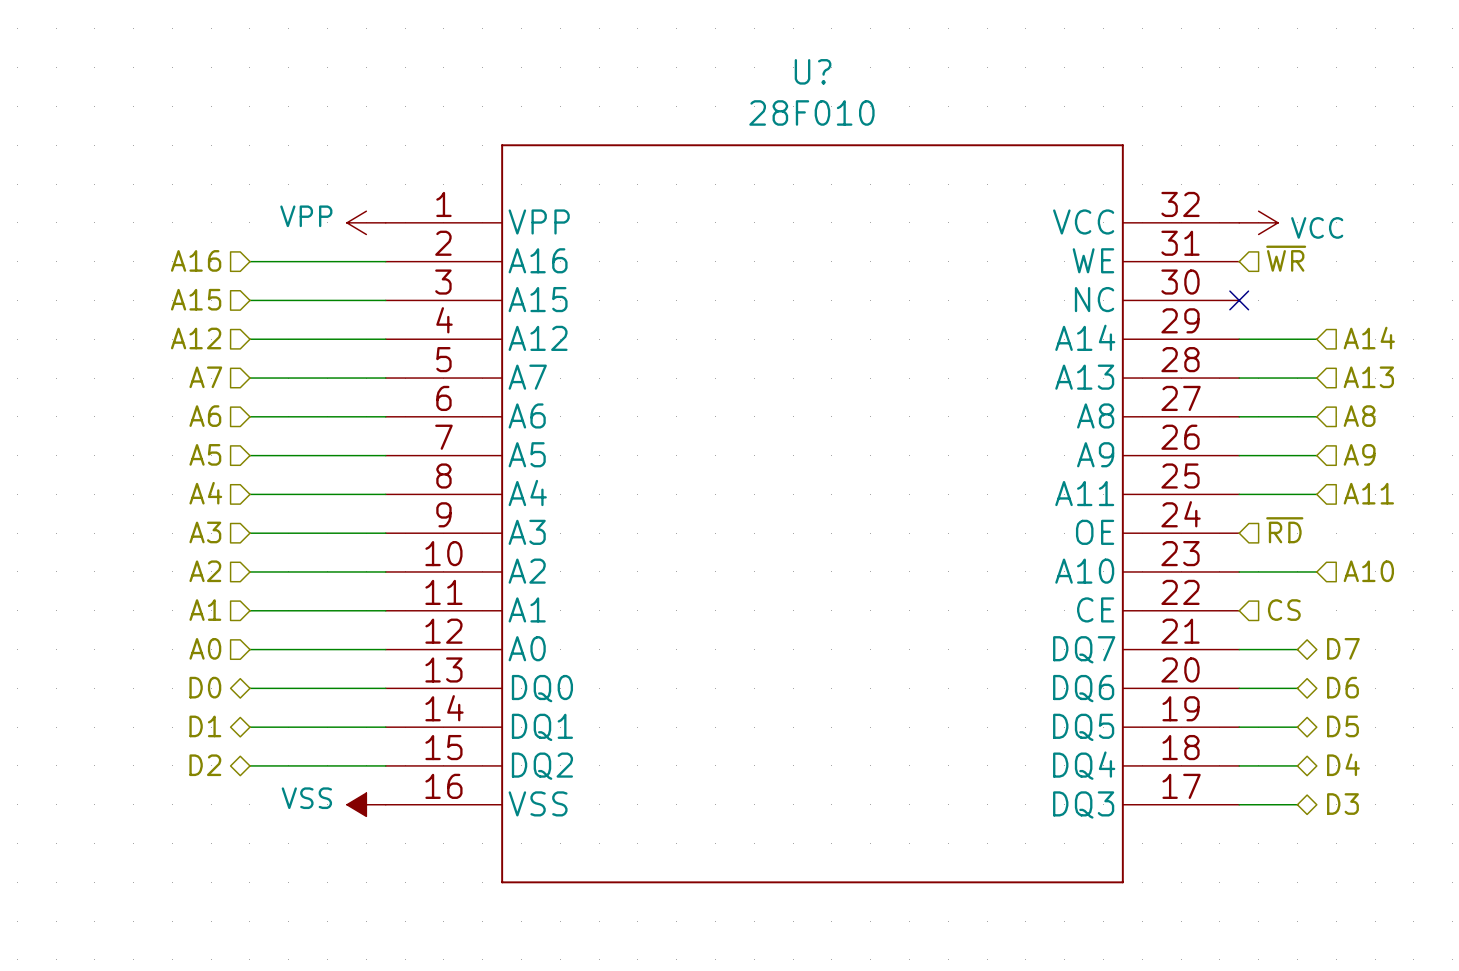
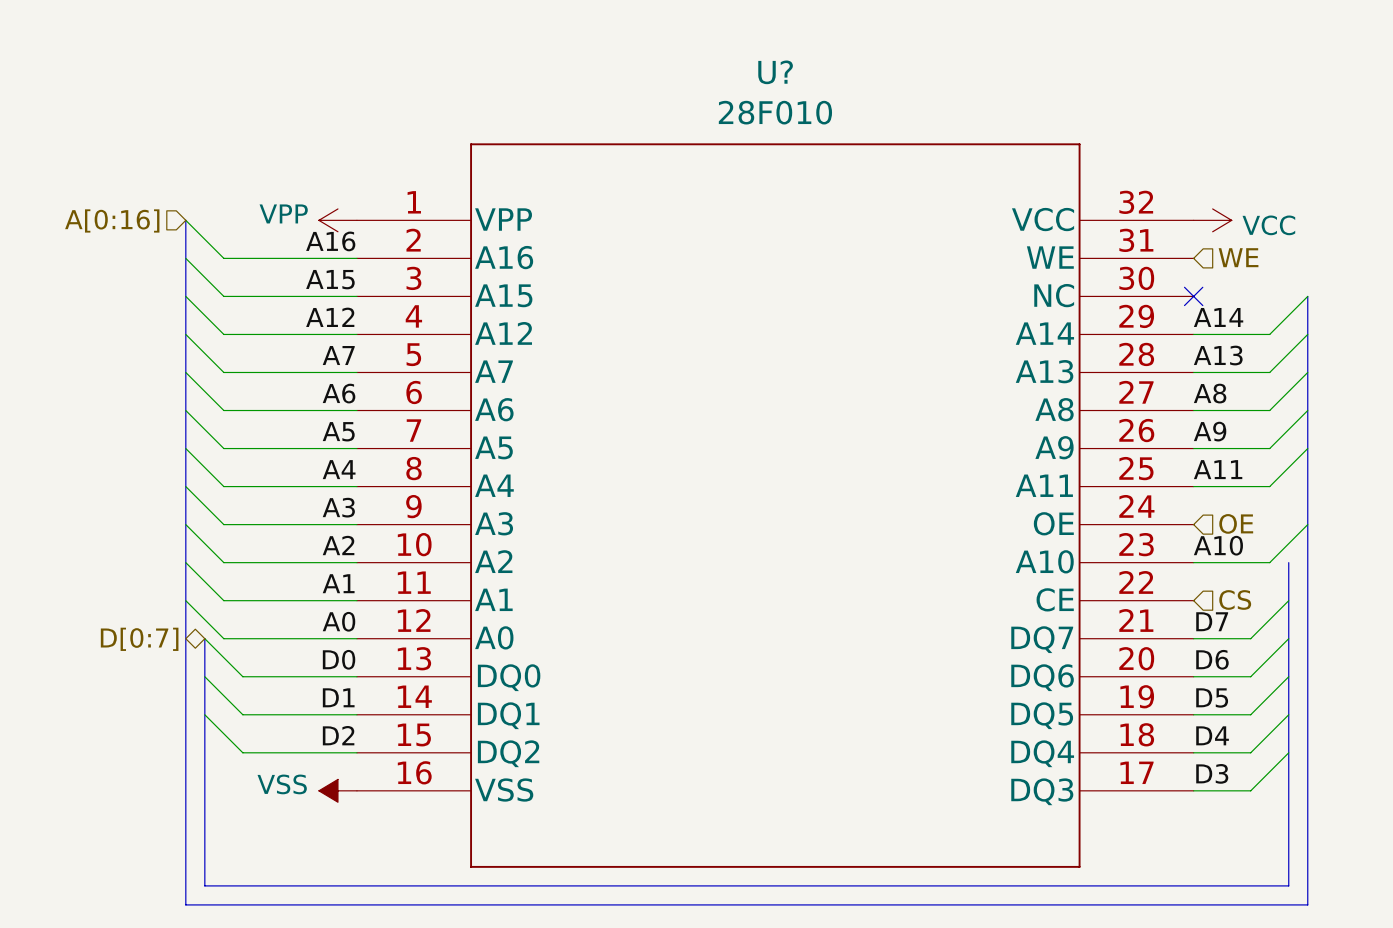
wire: none -> (185, 220) (223, 258)
bus: none -> (185, 220) (185, 904) (1307, 904) (1307, 296)
hierarchical label: none -> A[0:16] (112, 220)
label: none -> A16 (330, 241)
hierarchical label: ~{WR} (1286, 258) -> WE (1238, 257)
hierarchical label: A16 (196, 260) -> none
wire: none -> (185, 258) (223, 296)
label: none -> A15 (330, 279)
hierarchical label: A15 (196, 299) -> none
wire: none -> (185, 296) (223, 334)
wire: none -> (1307, 296) (1269, 334)
label: none -> A12 (330, 317)
label: none -> A14 (1218, 317)
hierarchical label: A12 (196, 338) -> none
hierarchical label: A14 (1369, 338) -> none
wire: none -> (185, 334) (223, 372)
wire: none -> (1307, 334) (1269, 372)
label: none -> A7 (338, 355)
label: none -> A13 (1218, 355)
hierarchical label: A7 (205, 377) -> none
hierarchical label: A13 (1368, 377) -> none
wire: none -> (185, 372) (223, 410)
wire: none -> (1307, 372) (1269, 410)
label: none -> A6 (339, 393)
label: none -> A8 (1210, 393)
hierarchical label: A6 (205, 416) -> none
wire: none -> (185, 410) (223, 448)
wire: none -> (1307, 410) (1269, 448)
hierarchical label: A8 (1359, 416) -> none
label: none -> A5 (338, 431)
label: none -> A9 (1210, 431)
hierarchical label: A5 (205, 454) -> none
hierarchical label: A9 (1359, 454) -> none
wire: none -> (185, 448) (223, 486)
wire: none -> (1307, 448) (1269, 486)
label: none -> A4 (339, 469)
label: none -> A11 (1218, 469)
hierarchical label: A4 (205, 493) -> none
hierarchical label: A11 (1368, 493) -> none
wire: none -> (185, 486) (223, 524)
label: none -> A3 (338, 507)
hierarchical label: ~{RD} (1284, 530) -> OE (1236, 523)
hierarchical label: A3 (205, 532) -> none
wire: none -> (185, 524) (223, 562)
wire: none -> (1307, 524) (1269, 562)
label: none -> A2 (338, 545)
label: none -> A10 (1218, 545)
hierarchical label: A2 (205, 571) -> none
wire: none -> (185, 562) (223, 600)
bus: none -> (1288, 562) (1288, 885) (204, 885) (204, 638)
hierarchical label: A10 (1368, 571) -> none
label: none -> A1 (338, 583)
hierarchical label: A1 (205, 610) -> none
wire: none -> (185, 600) (223, 638)
wire: none -> (1288, 600) (1250, 638)
label: none -> A0 (338, 621)
label: none -> D7 (1212, 621)
hierarchical label: A0 (205, 648) -> none
hierarchical label: D7 (1343, 648) -> none
wire: none -> (1288, 638) (1250, 676)
hierarchical label: none -> D[0:7] (139, 639)
label: none -> D0 (339, 659)
label: none -> D6 (1212, 659)
hierarchical label: D0 (205, 687) -> none
hierarchical label: D6 (1342, 687) -> none
wire: (249, 688) (269, 688) -> (204, 638) (242, 676)
wire: none -> (1288, 676) (1250, 714)
label: none -> D1 (338, 697)
label: none -> D5 (1212, 697)
hierarchical label: D1 (205, 726) -> none
hierarchical label: D5 (1342, 726) -> none
wire: (249, 727) (269, 727) -> (204, 676) (242, 714)
wire: none -> (1288, 714) (1250, 752)
label: none -> D2 (338, 735)
label: none -> D4 (1212, 735)
hierarchical label: D4 (1343, 764) -> none
hierarchical label: D2 (205, 765) -> none
wire: (249, 765) (269, 765) -> (204, 714) (242, 752)
wire: none -> (1288, 752) (1250, 790)
label: none -> D3 (1212, 773)
hierarchical label: D3 (1342, 804) -> none

